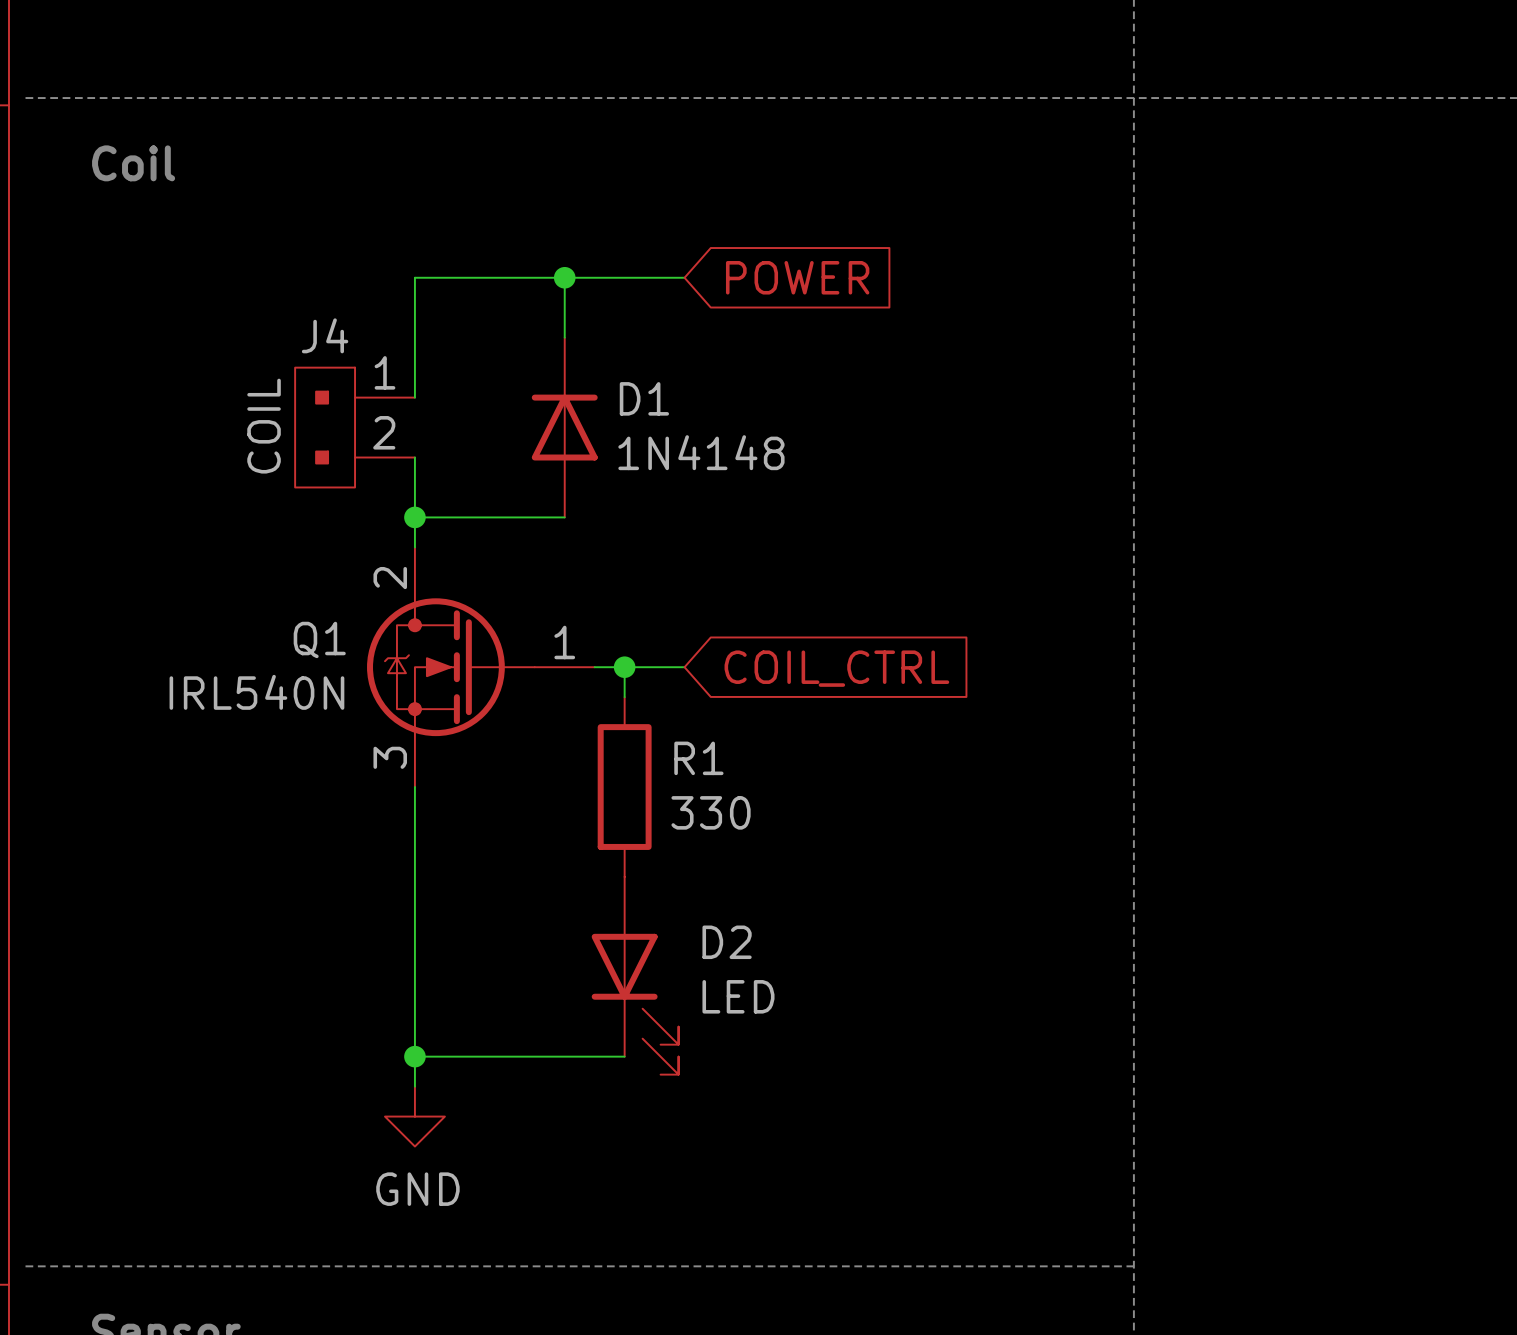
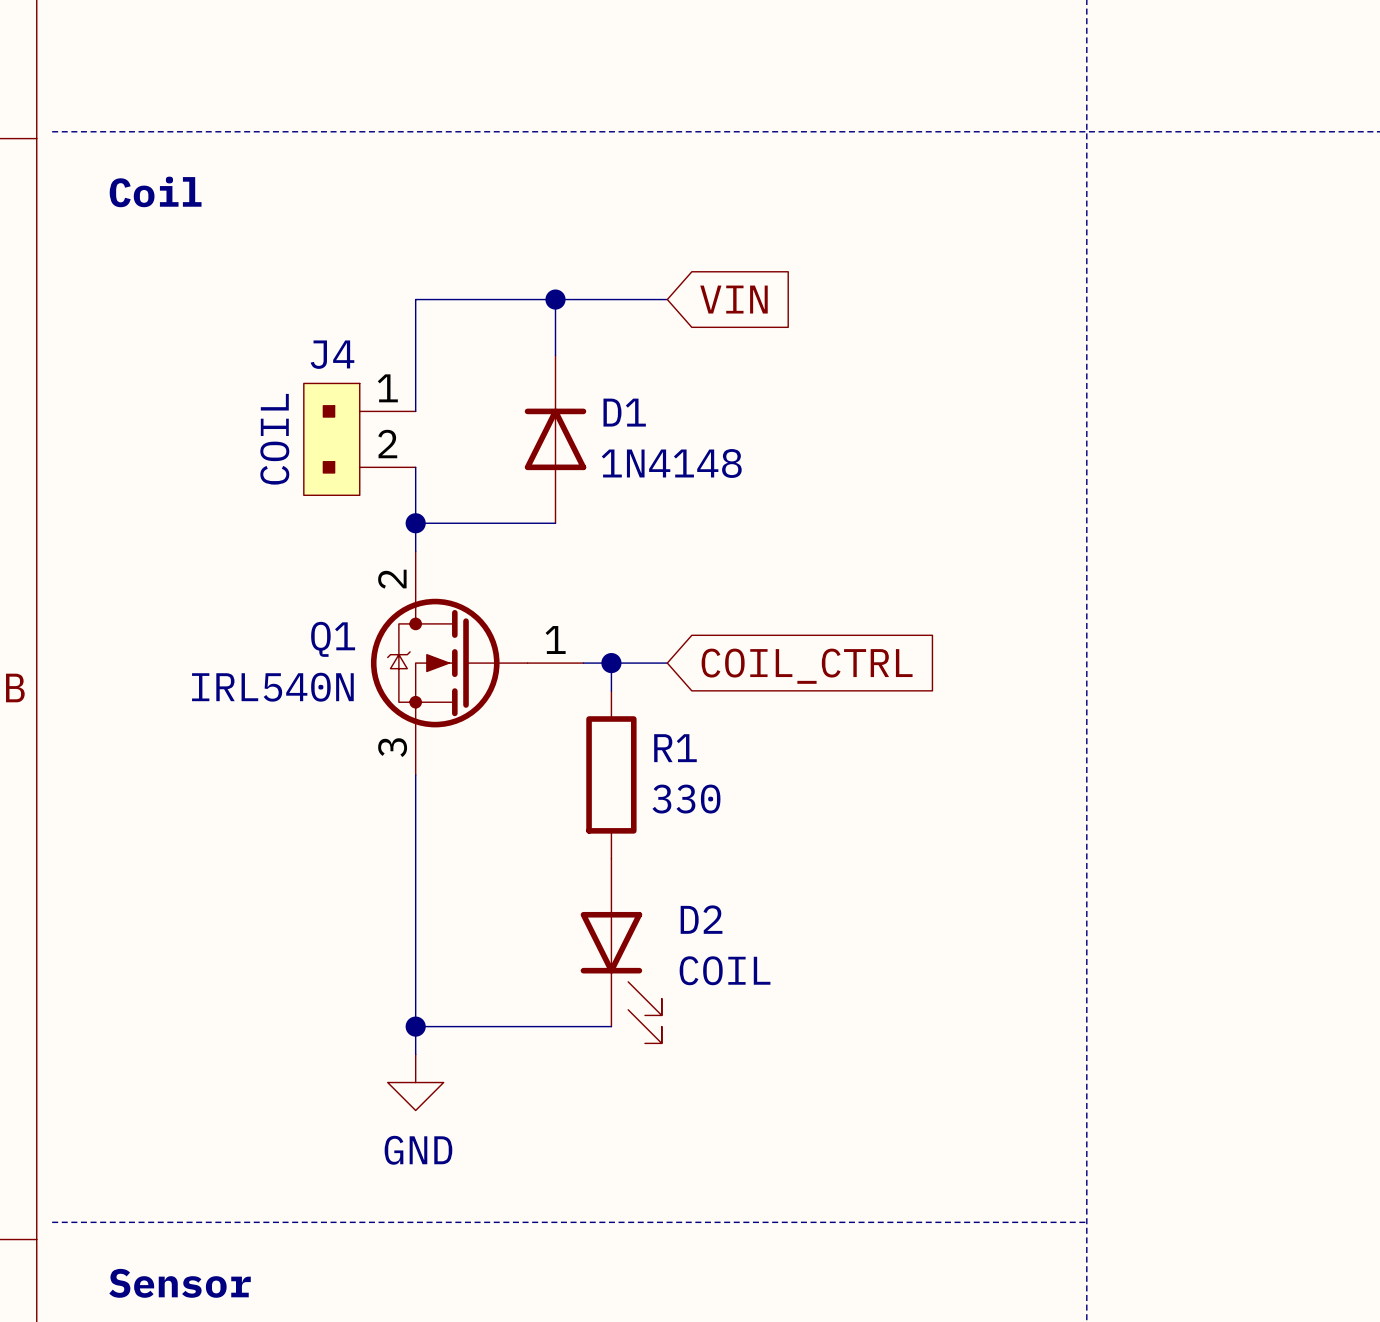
global label: POWER (797, 277) -> VIN (733, 299)
D2 value: LED (738, 996) -> COIL (725, 970)

